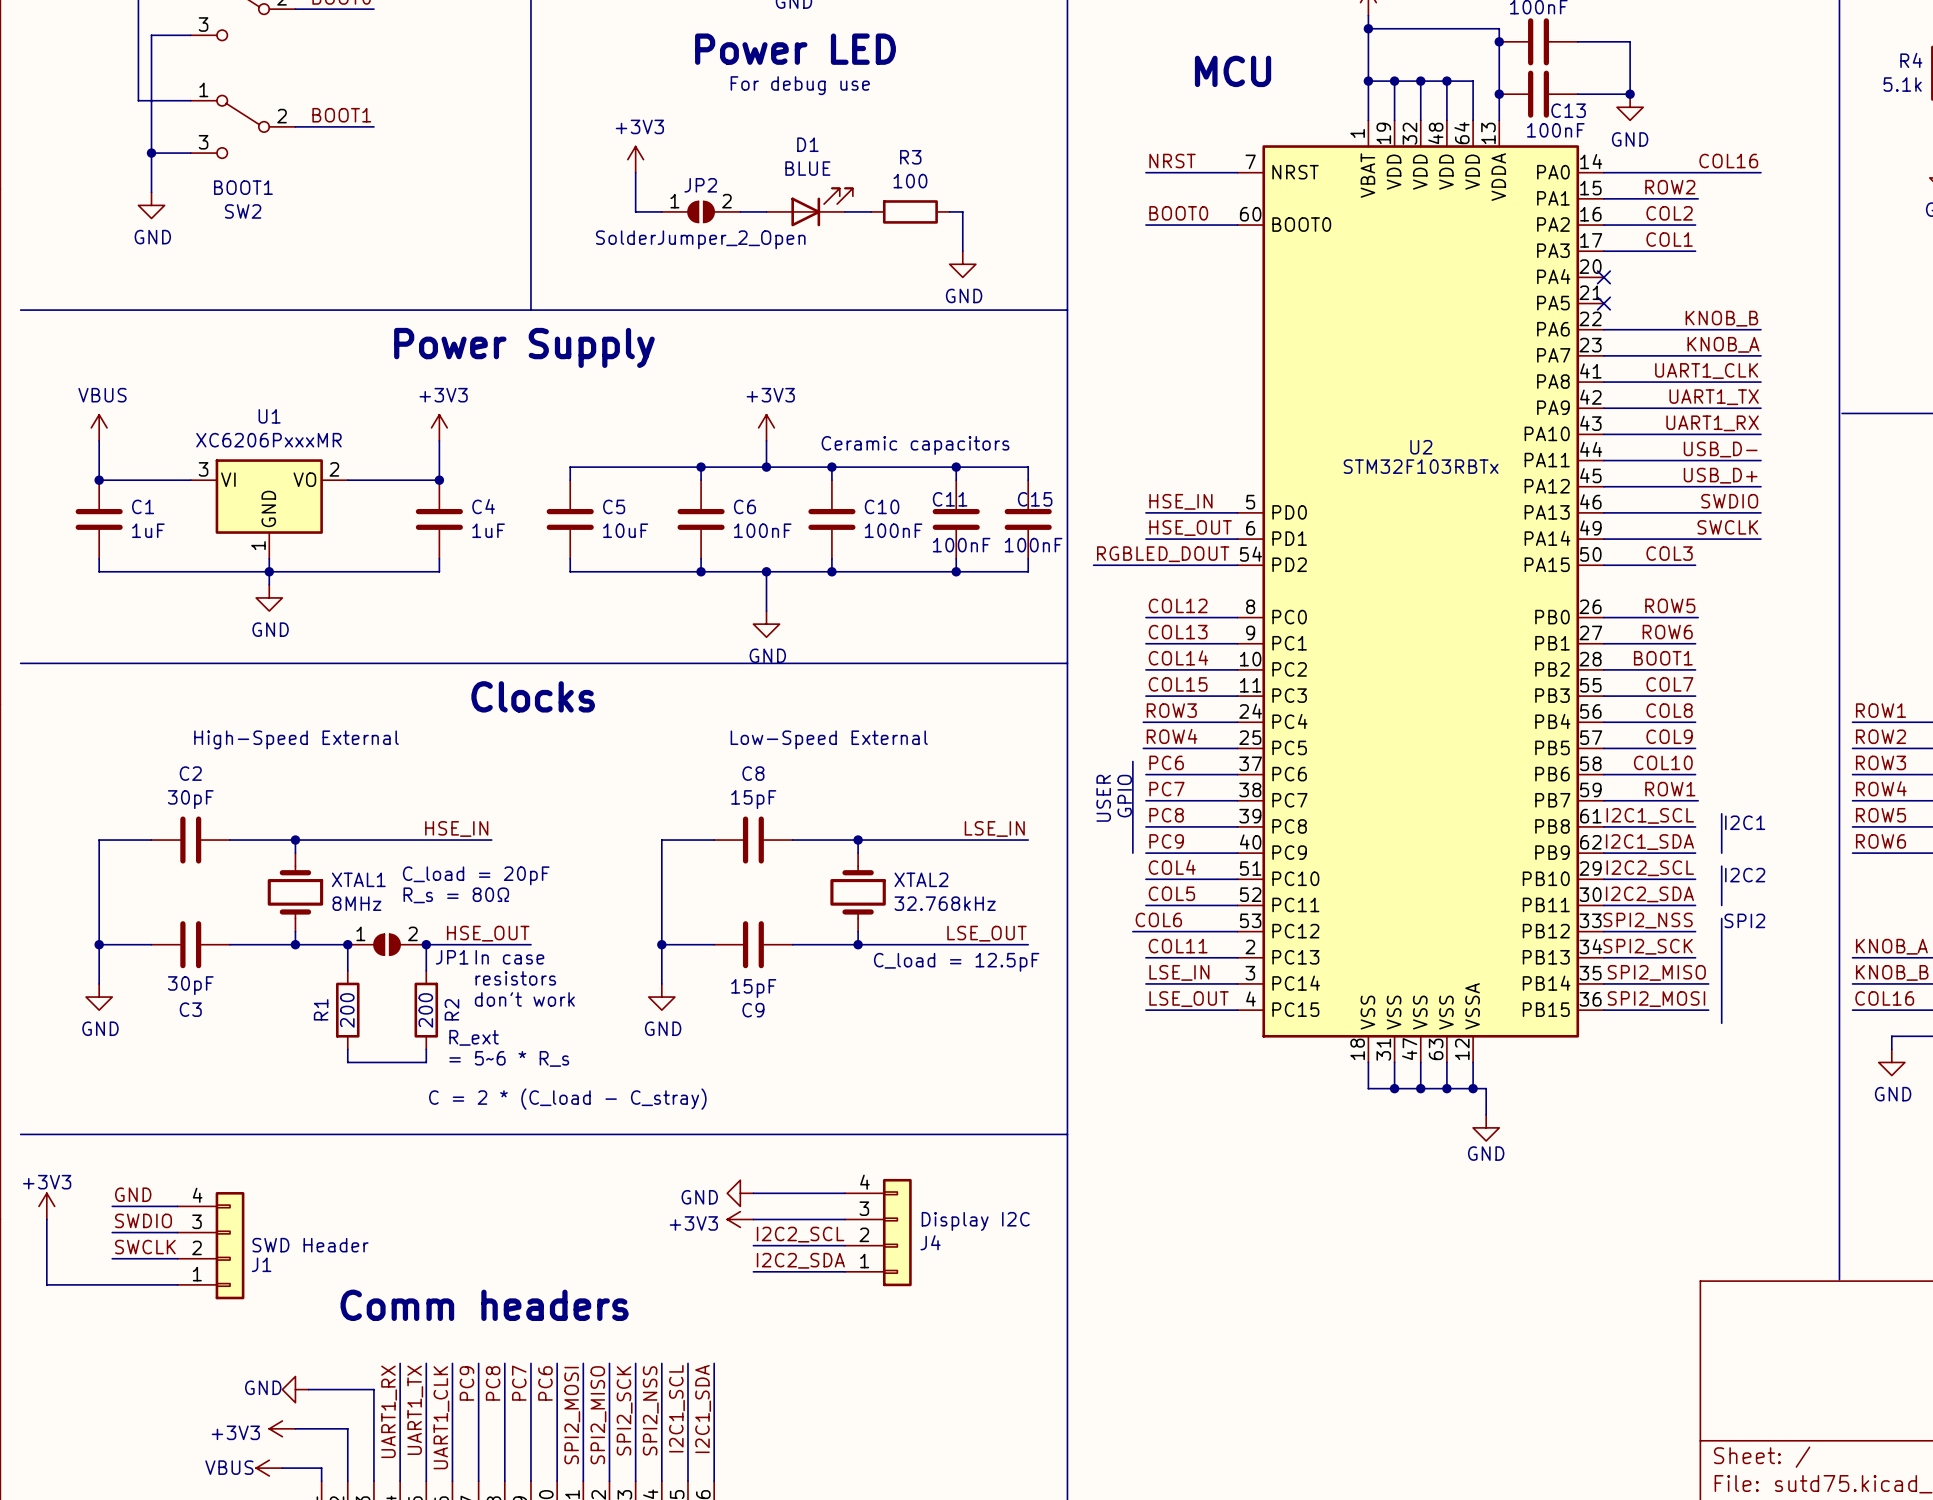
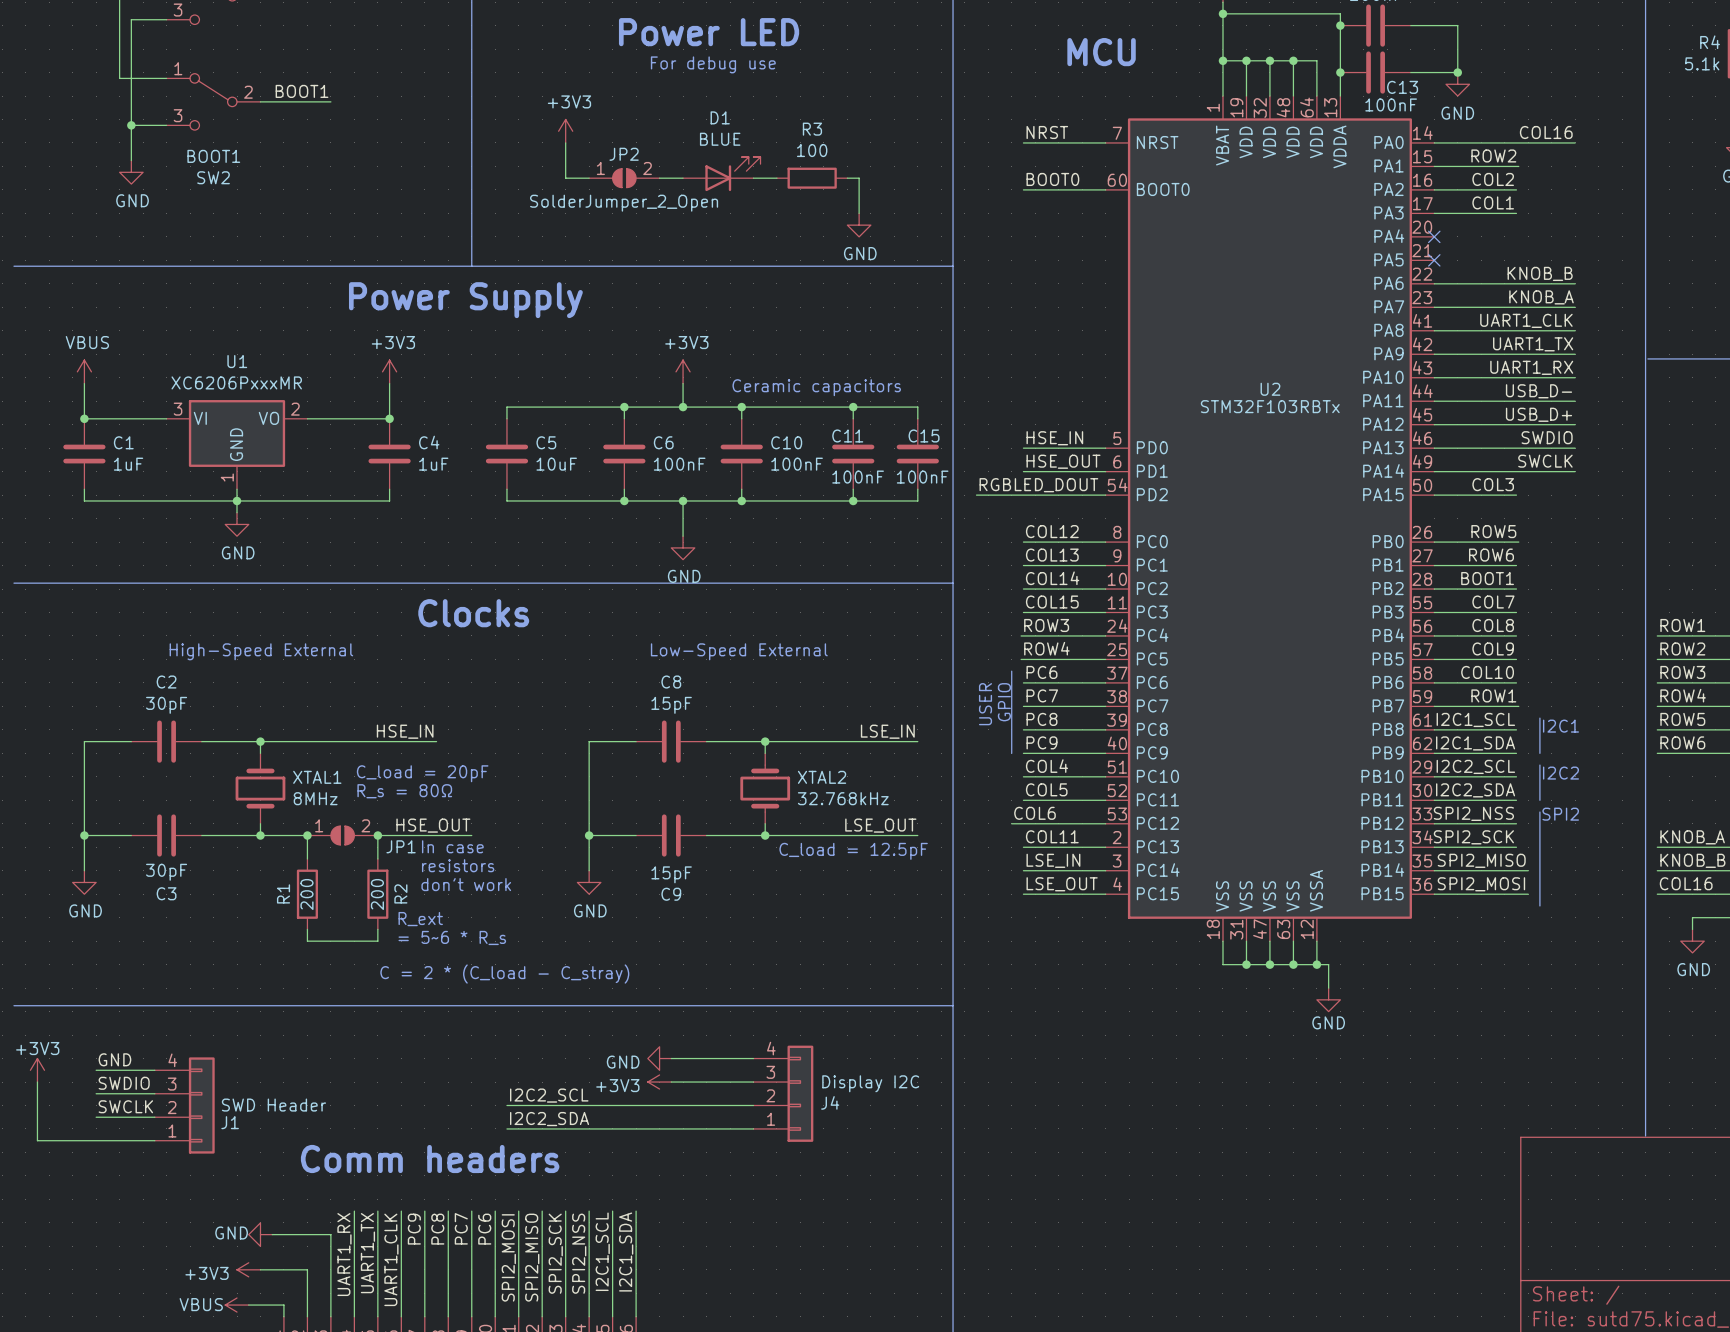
label position: I2C2_SCL (800, 1234) -> I2C2_SCL (549, 1095)
wire: none -> (506, 1105) (671, 1105)
label position: I2C2_SDA (800, 1260) -> I2C2_SDA (549, 1119)
wire: none -> (506, 1128) (671, 1128)

